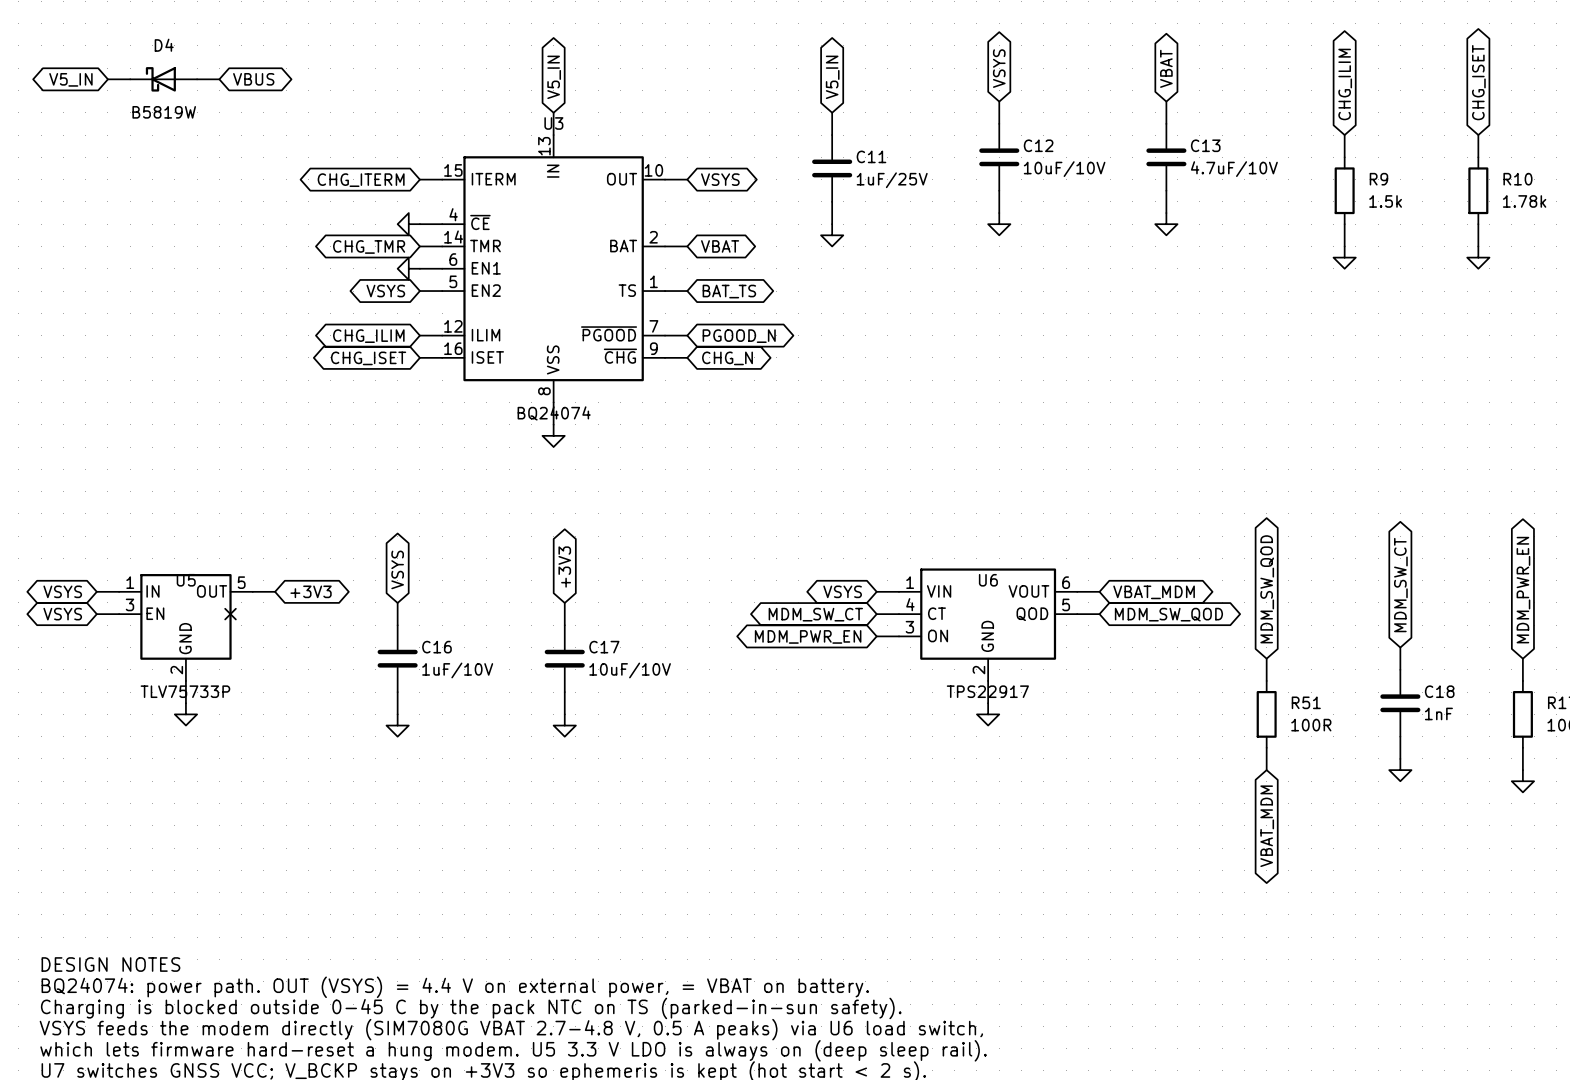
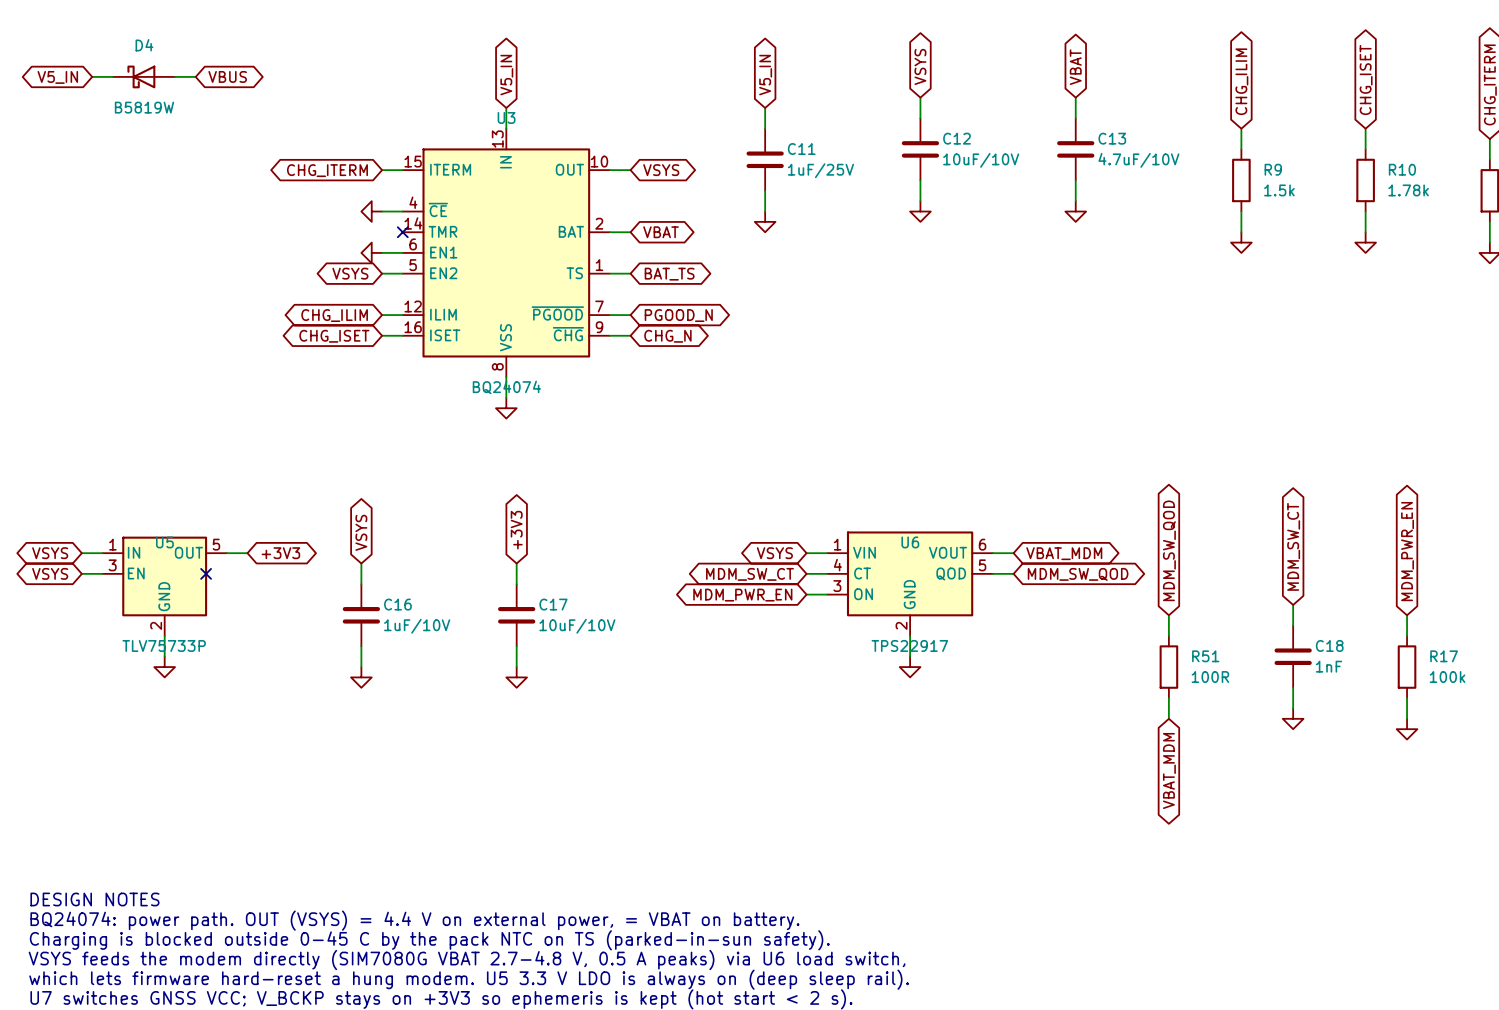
global label: CHG_TMR (369, 246) -> none
wire: (419, 246) (442, 246) -> none
no-connect mark: none -> (402, 232)

